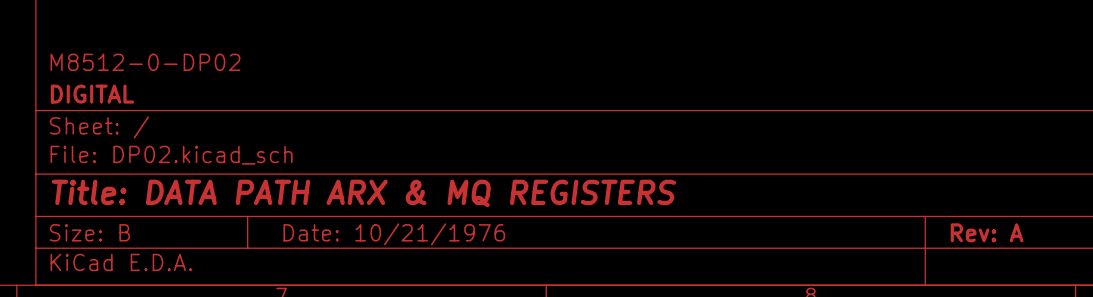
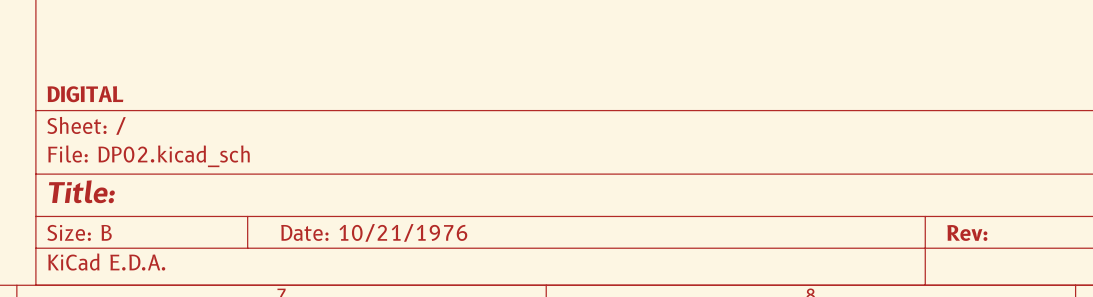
title block: M8512-0-DP02 (145, 62) -> none
title block: Title: DATA PATH ARX & MQ REGISTERS (363, 193) -> Title: (81, 191)
title block: Rev: A (987, 232) -> Rev: (967, 233)

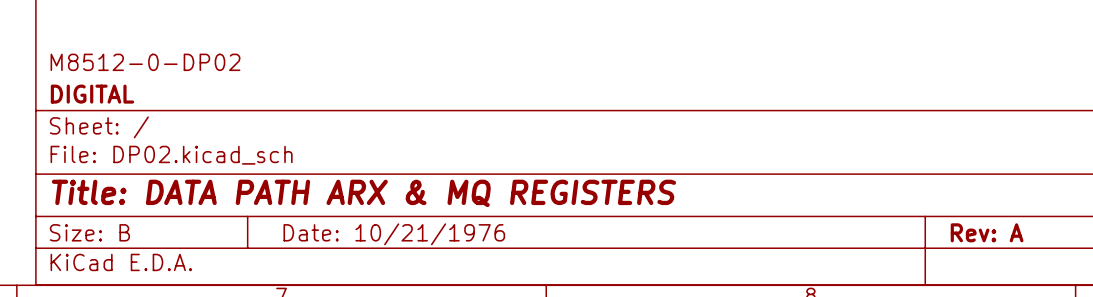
title block: none -> M8512-0-DP02 (145, 62)
title block: Title: (81, 191) -> Title: DATA PATH ARX & MQ REGISTERS (363, 193)
title block: Rev: (967, 233) -> Rev: A (987, 232)

